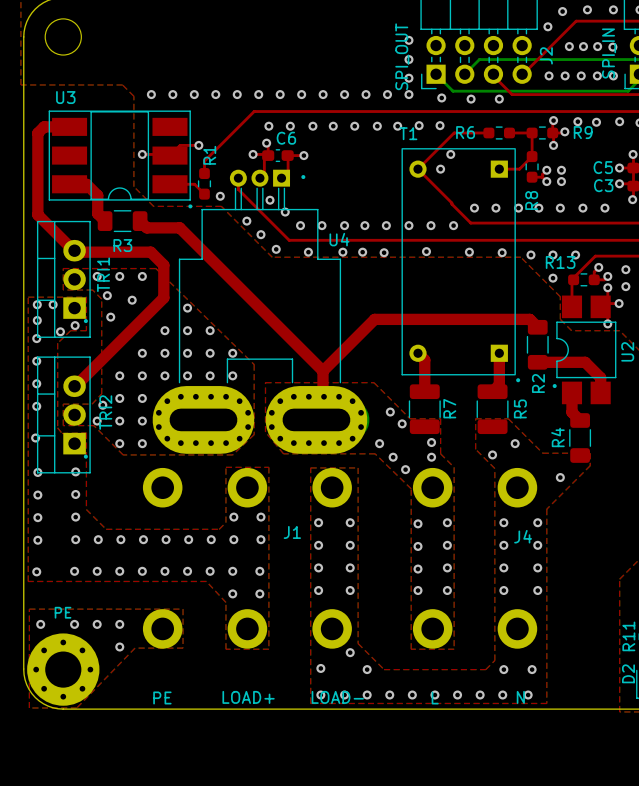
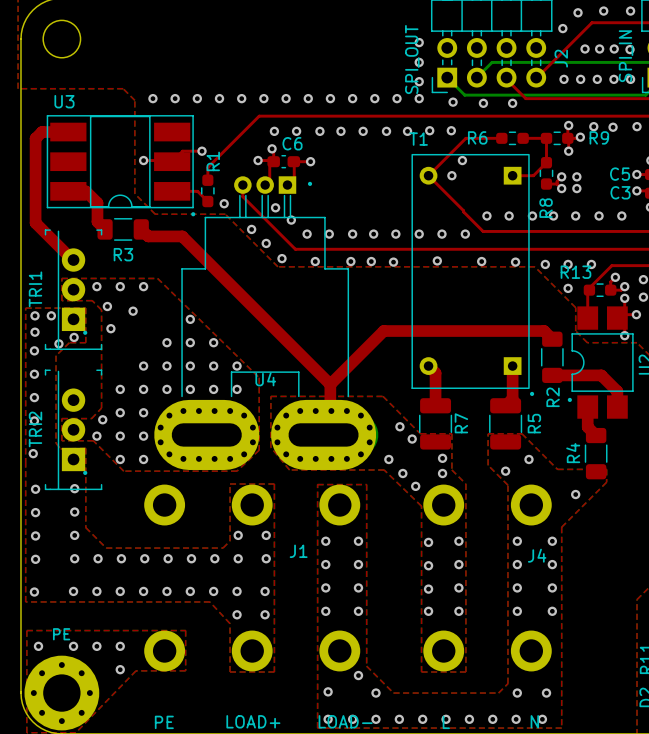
TRI1 footprint: [36, 220, 91, 338] -> [44, 229, 103, 350]
U4 name position: U4 (339, 239) -> U4 (265, 379)
top track: (75, 252) (150, 252) (163, 265) (163, 297) (75, 386) -> none
TRI1 name position: TRI1 (103, 274) -> TRI1 (35, 289)
TRI2 footprint: [36, 356, 91, 474] -> [44, 369, 103, 490]
TRI2 name position: TRI2 (105, 412) -> TRI2 (35, 429)

